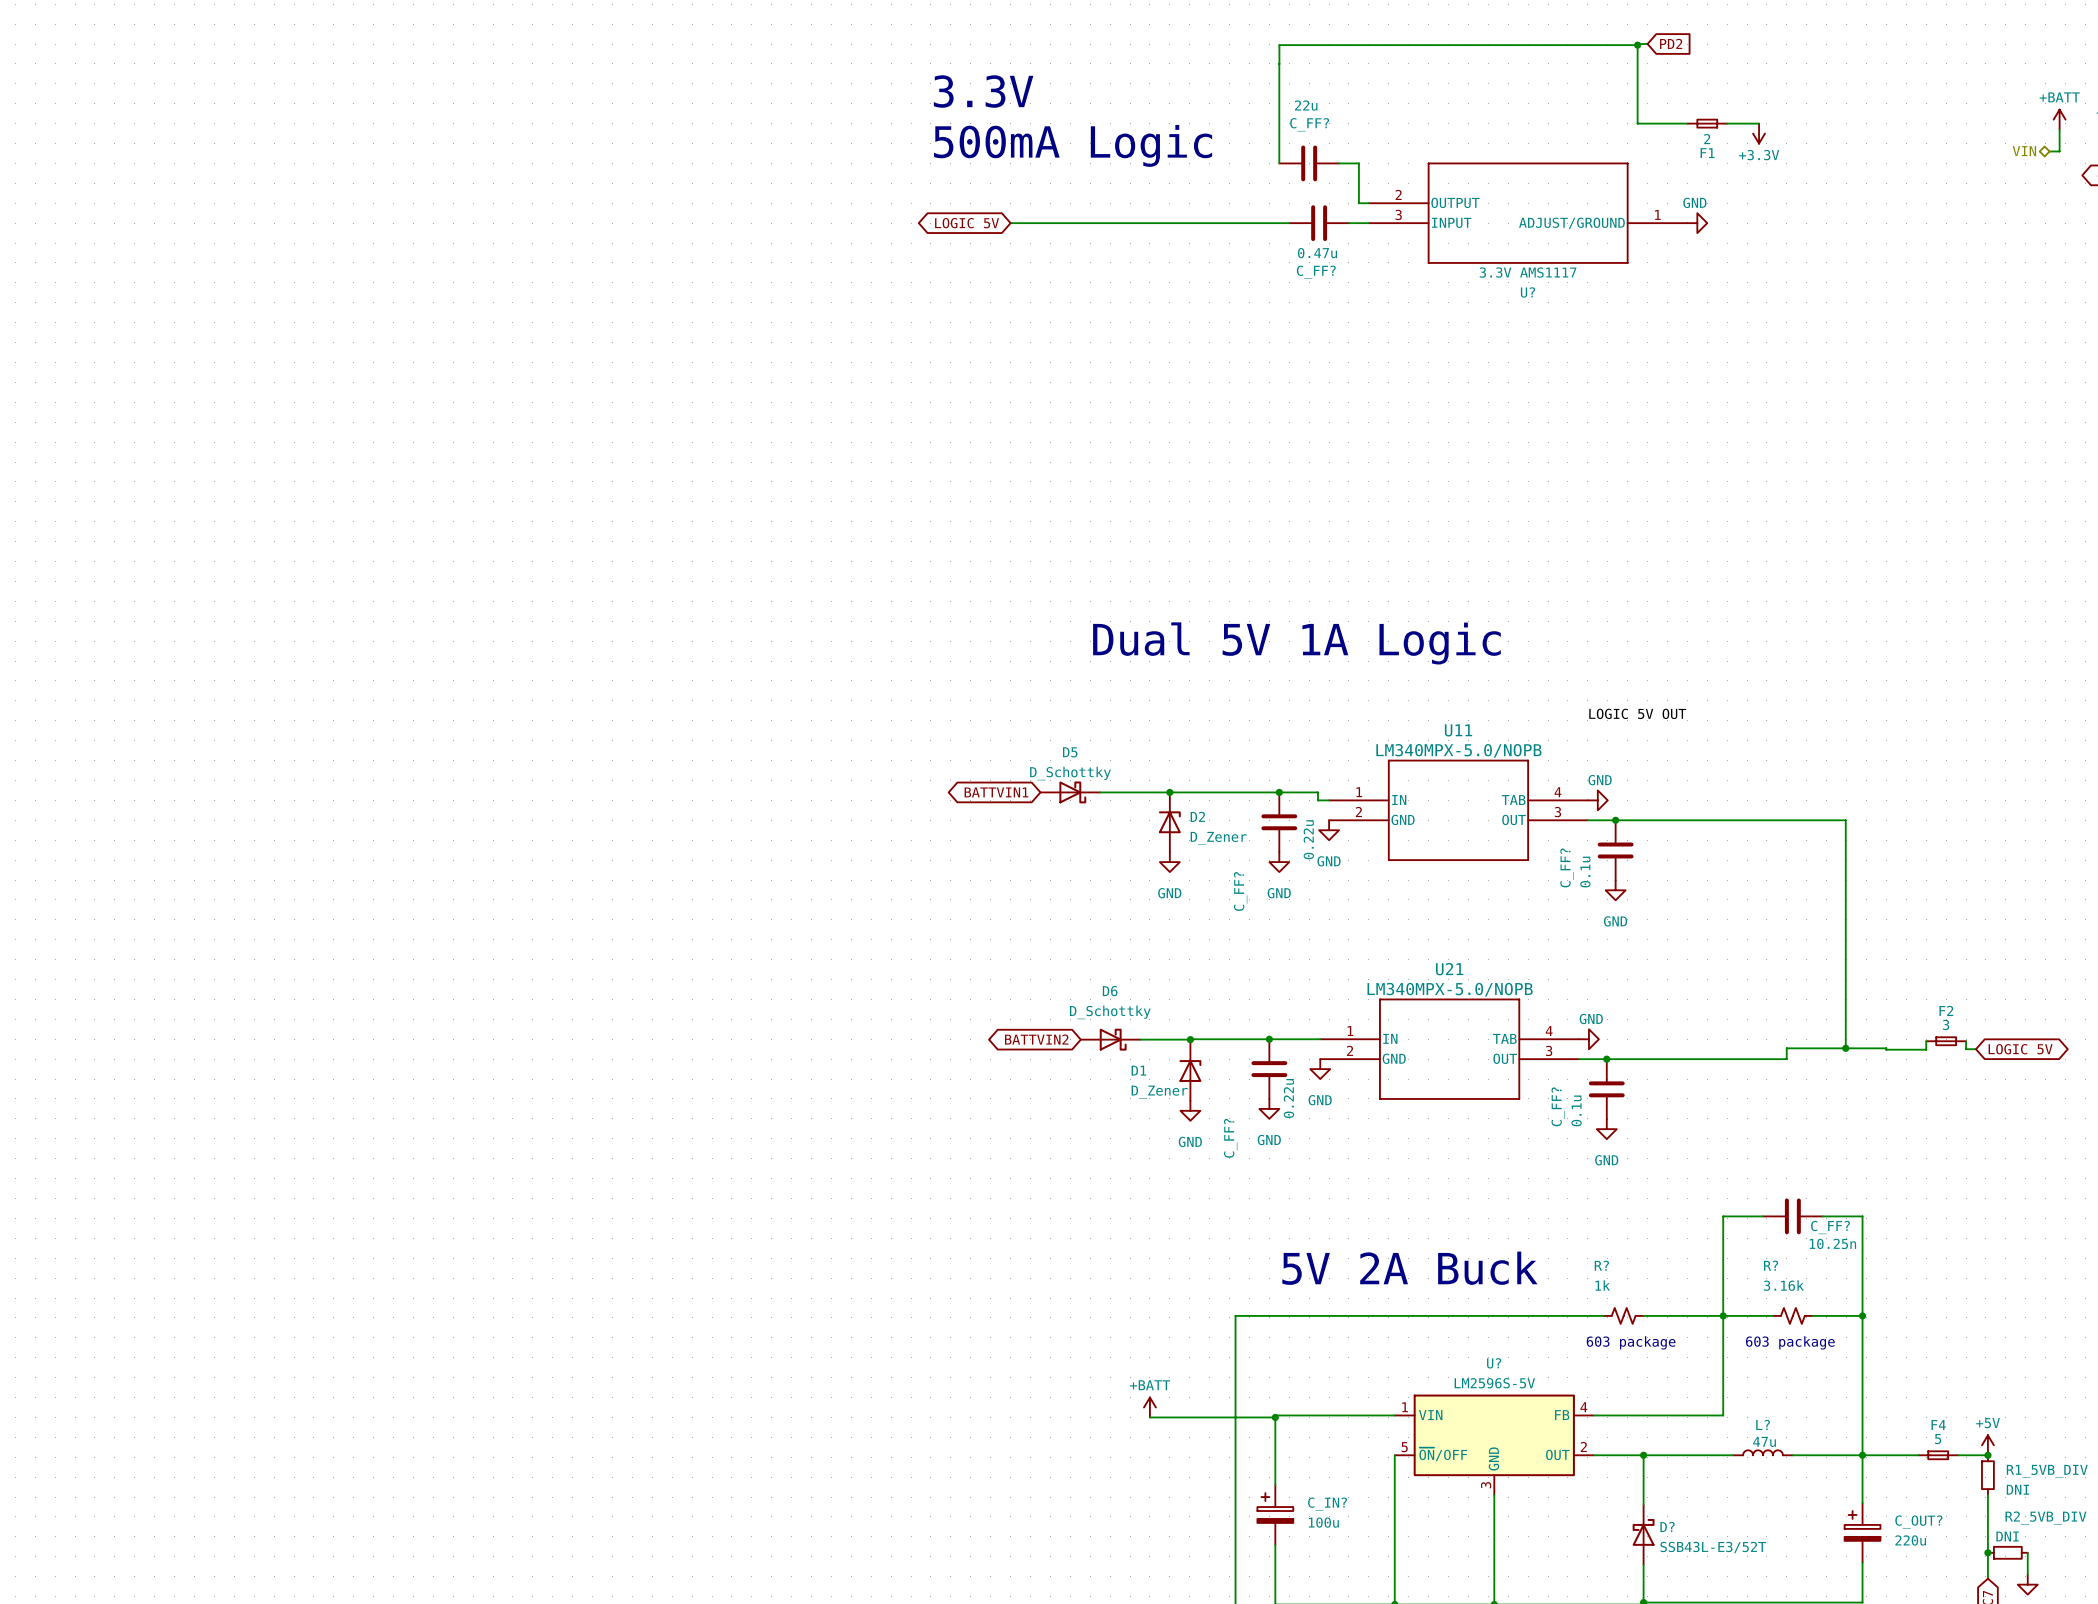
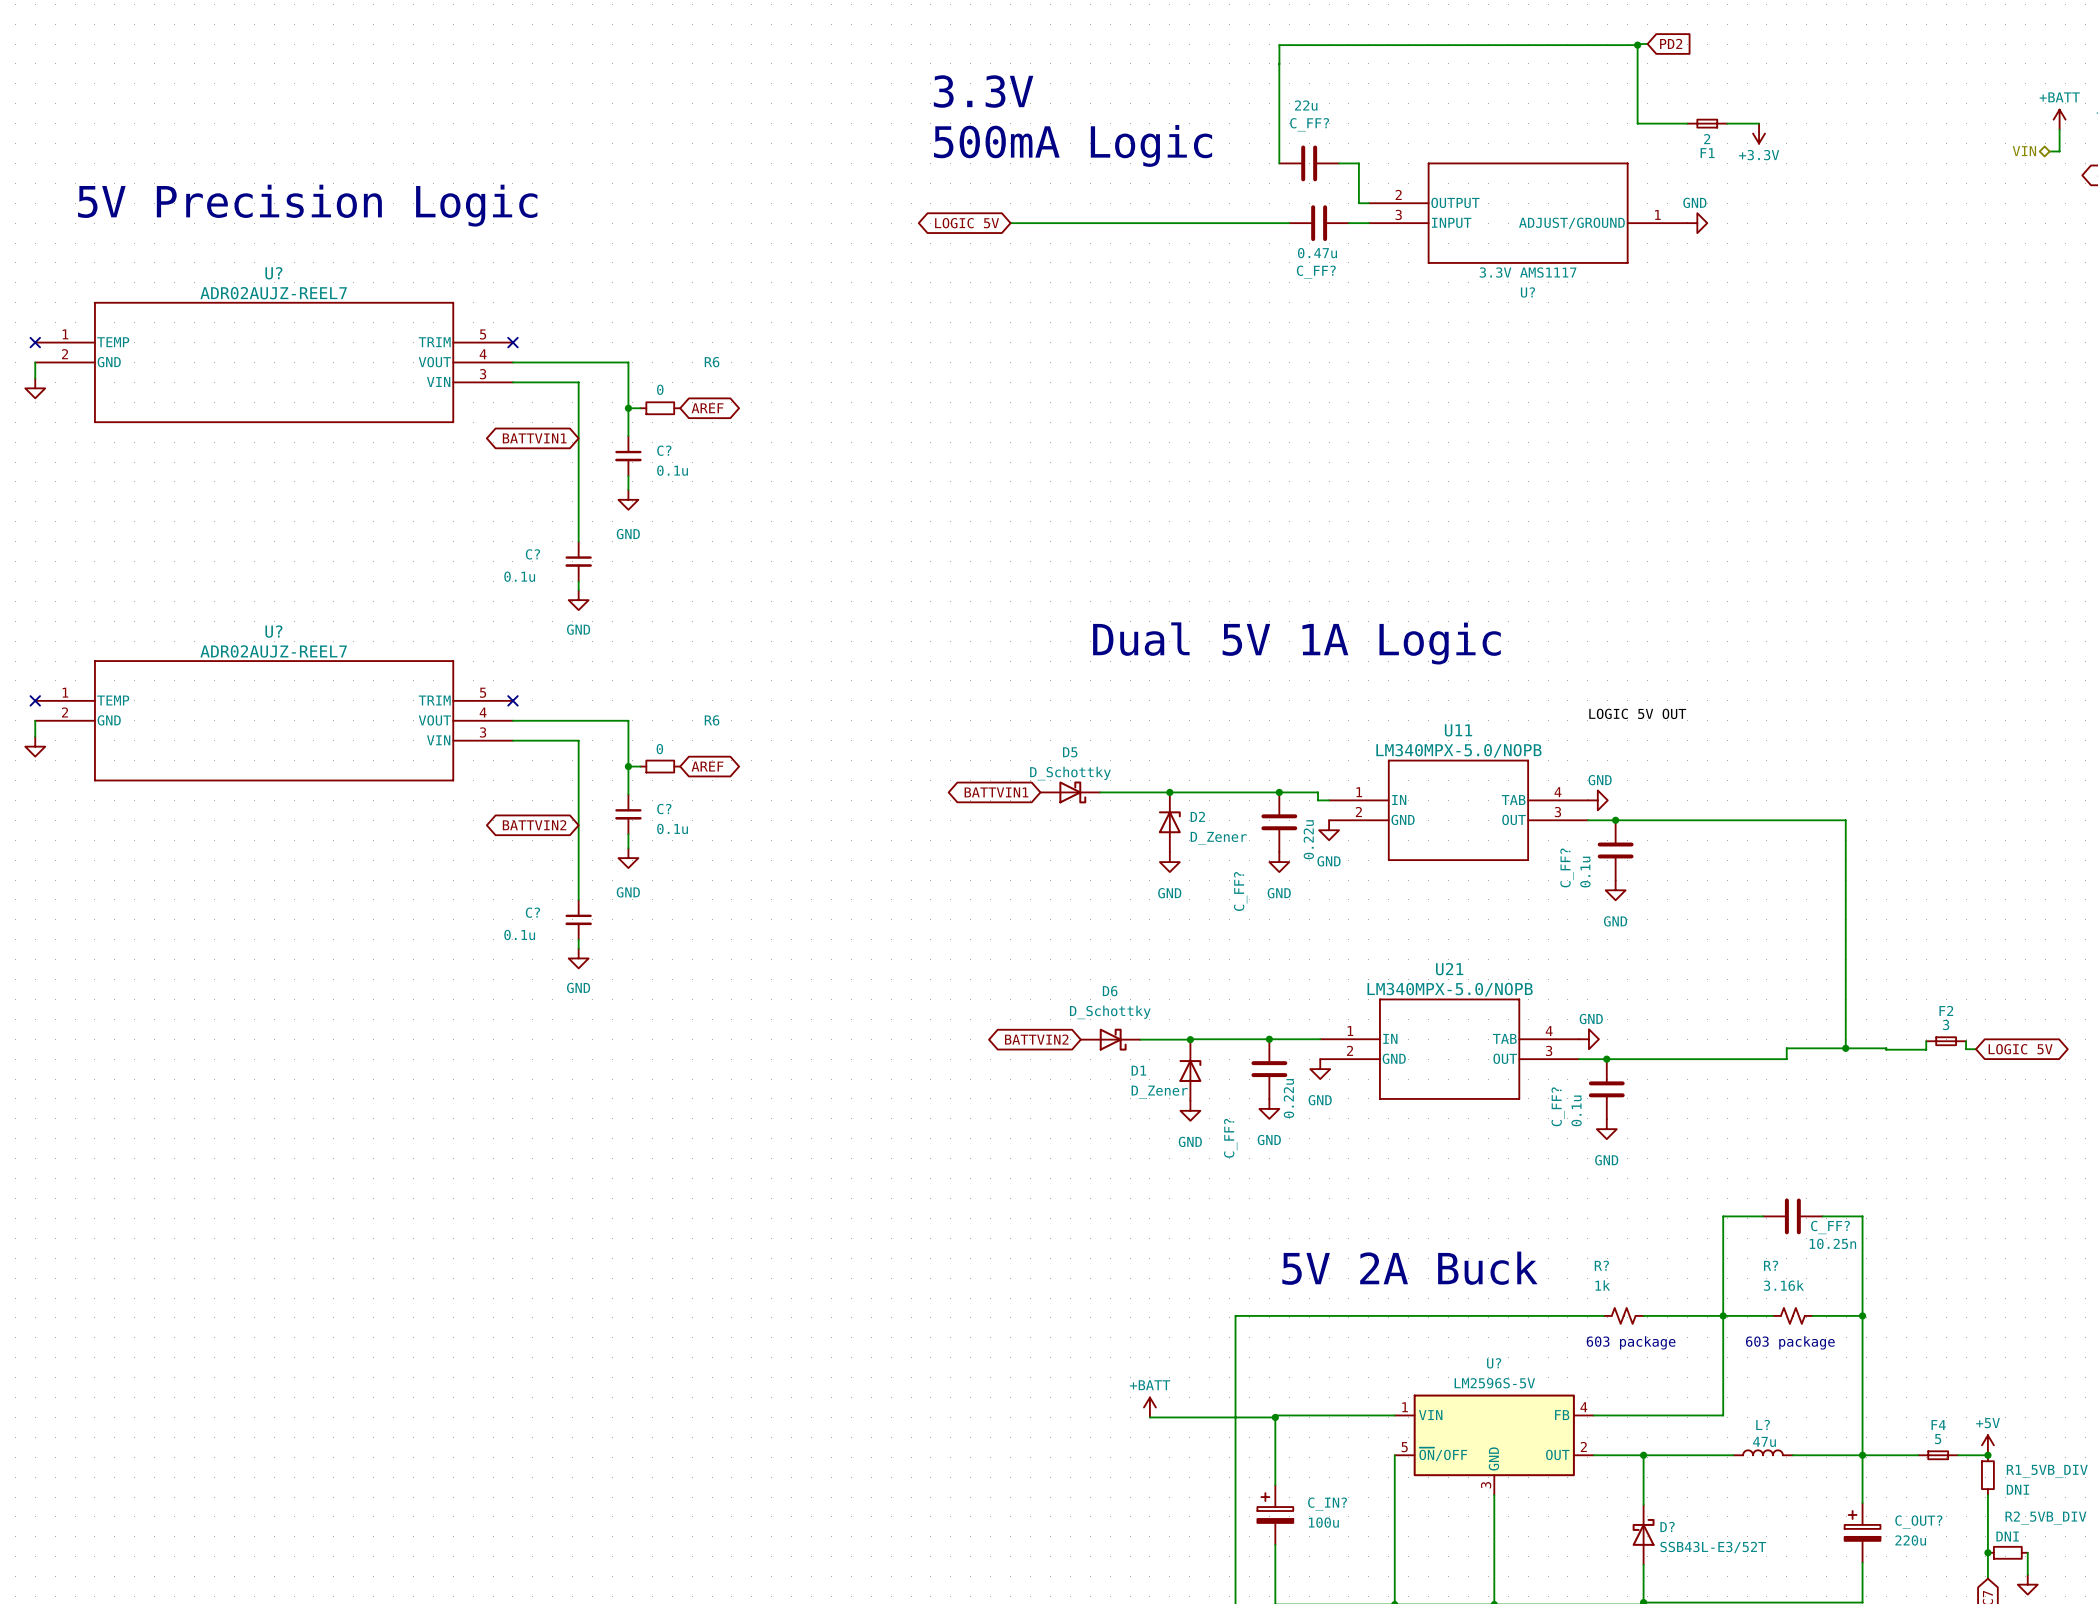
text: none -> 5V Precision Logic (307, 205)
no-connect mark: none -> (35, 342)
no-connect mark: none -> (512, 342)
wire: none -> (35, 362) (35, 378)
U?: none -> ADR02AUJZ-REEL7 (274, 362)
wire: none -> (512, 362) (628, 362) (628, 436)
wire: none -> (512, 382) (578, 382) (578, 541)
power symbol: none -> (35, 388)
wire: none -> (628, 408) (640, 408)
junction: none -> (628, 408)
R6: none -> 0 (660, 408)
global label: none -> AREF (707, 408)
global label: none -> BATTVIN1 (534, 438)
C?: none -> 0.1u (628, 456)
wire: none -> (628, 475) (628, 489)
power symbol: none -> GND (628, 499)
C?: none -> 0.1u (578, 561)
wire: none -> (578, 581) (578, 590)
power symbol: none -> GND (578, 600)
no-connect mark: none -> (35, 700)
no-connect mark: none -> (512, 700)
wire: none -> (35, 720) (35, 736)
U?: none -> ADR02AUJZ-REEL7 (274, 720)
wire: none -> (512, 720) (628, 720) (628, 794)
wire: none -> (512, 740) (578, 740) (578, 899)
power symbol: none -> (35, 746)
wire: none -> (628, 766) (640, 766)
junction: none -> (628, 766)
R6: none -> 0 (660, 766)
global label: none -> AREF (707, 766)
C?: none -> 0.1u (628, 814)
global label: none -> BATTVIN2 (534, 825)
wire: none -> (628, 834) (628, 848)
power symbol: none -> GND (628, 858)
C?: none -> 0.1u (578, 919)
wire: none -> (578, 939) (578, 948)
power symbol: none -> GND (578, 958)

